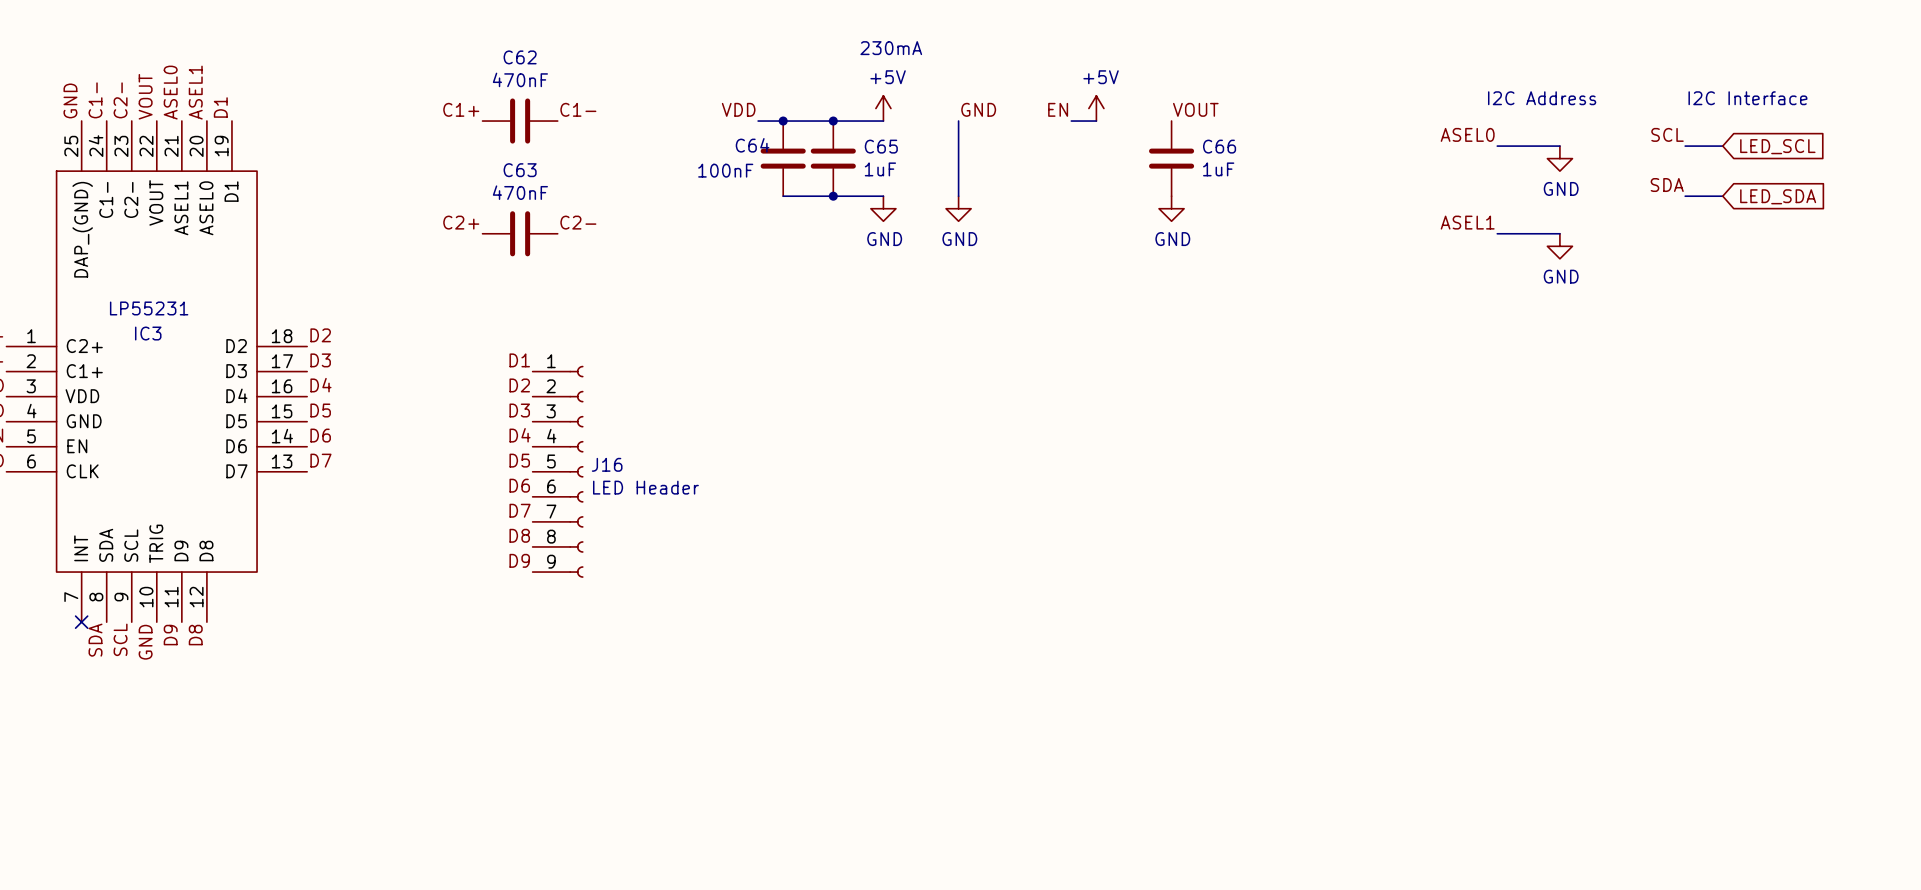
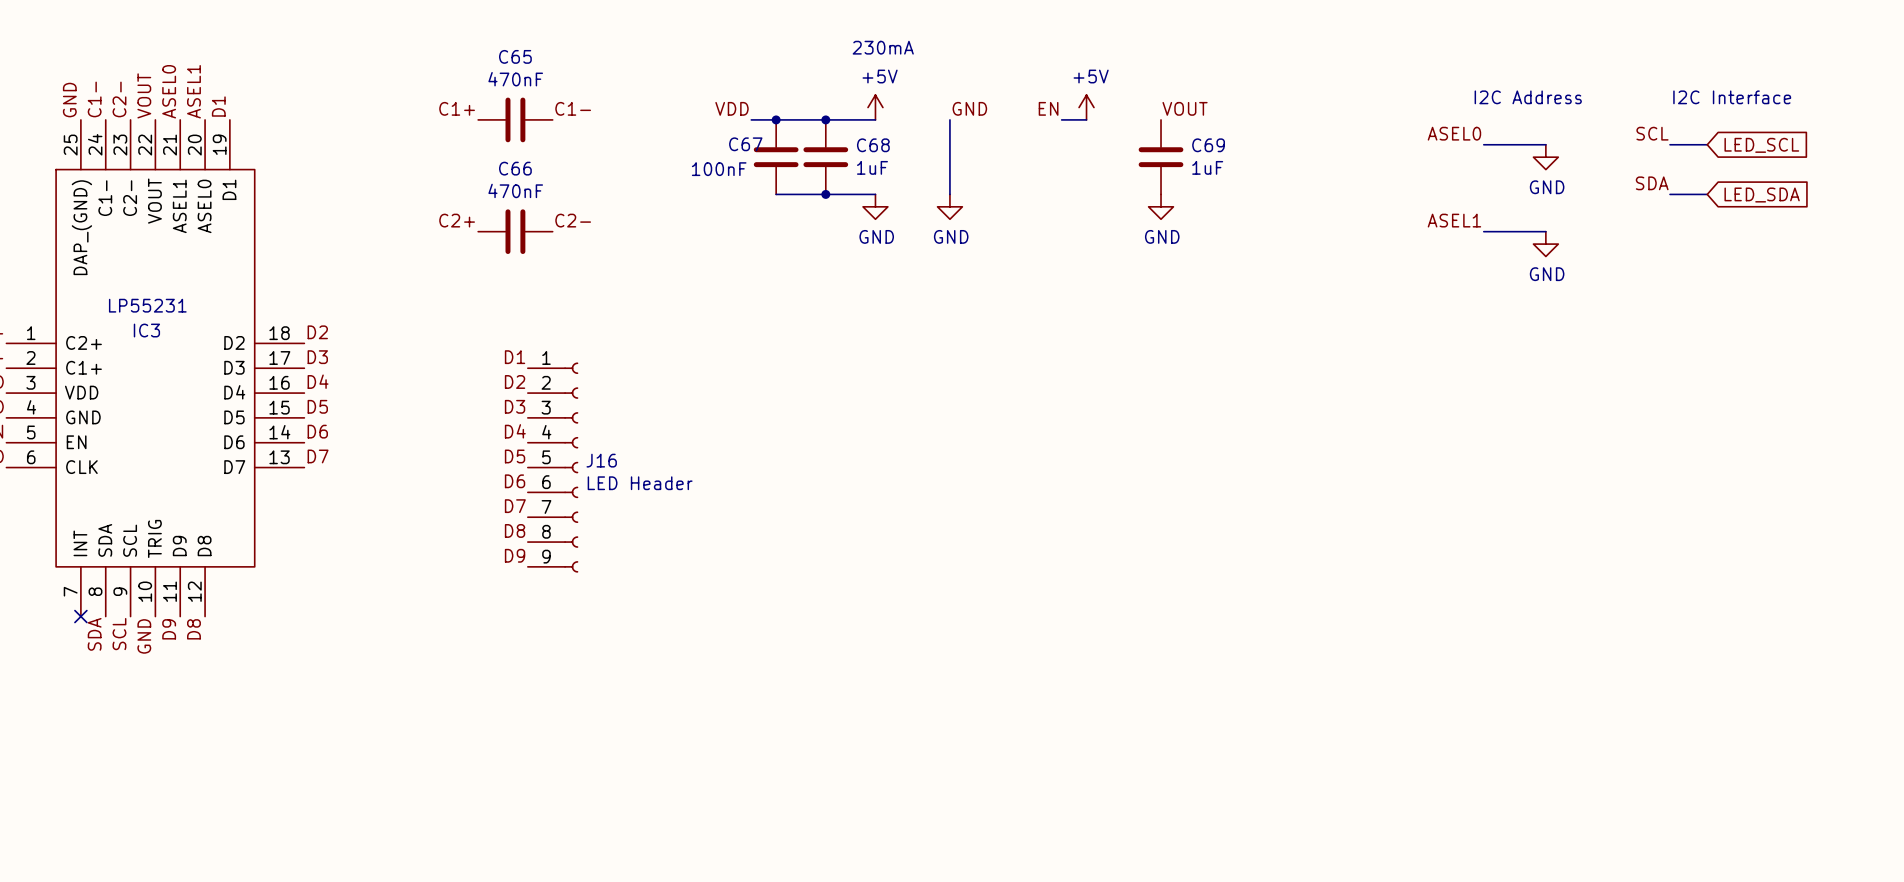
C62 name: C62 (520, 57) -> C65 (515, 56)
C64 name: C64 (752, 145) -> C67 (745, 144)
C65 name: C65 (881, 146) -> C68 (873, 145)
C66 name: C66 (1219, 146) -> C69 (1208, 145)
C63 name: C63 (520, 170) -> C66 (515, 168)

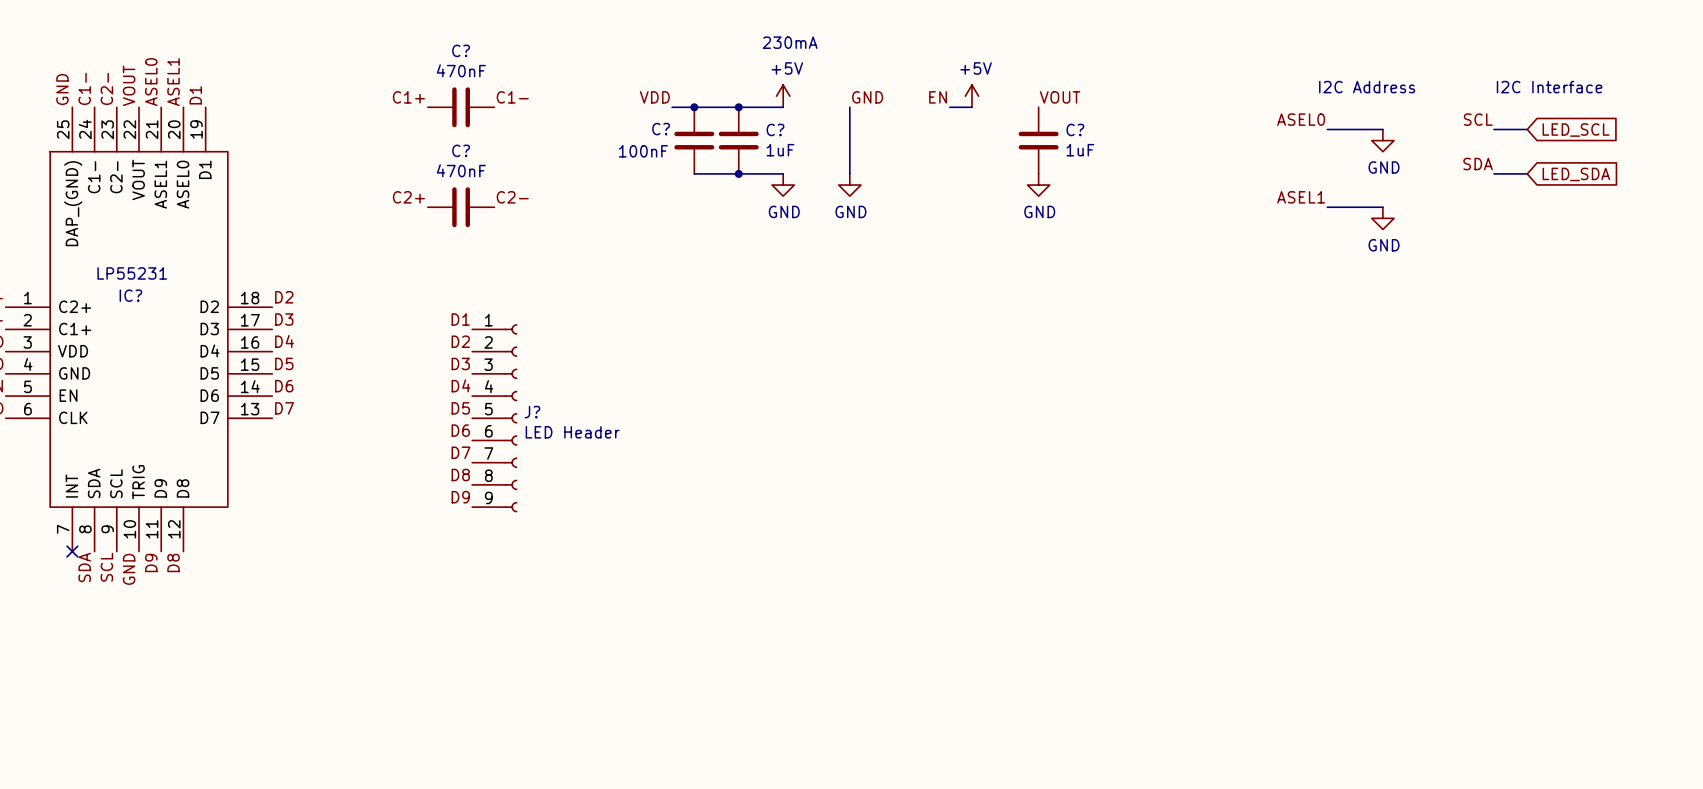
C65 name: C65 (515, 56) -> C? (461, 50)
C67 name: C67 (745, 144) -> C? (661, 129)
C68 name: C68 (873, 145) -> C? (775, 129)
C69 name: C69 (1208, 145) -> C? (1075, 129)
C66 name: C66 (515, 168) -> C? (461, 150)
IC3 name: IC3 (146, 330) -> IC? (130, 295)
J16 name: J16 (601, 460) -> J? (532, 412)

